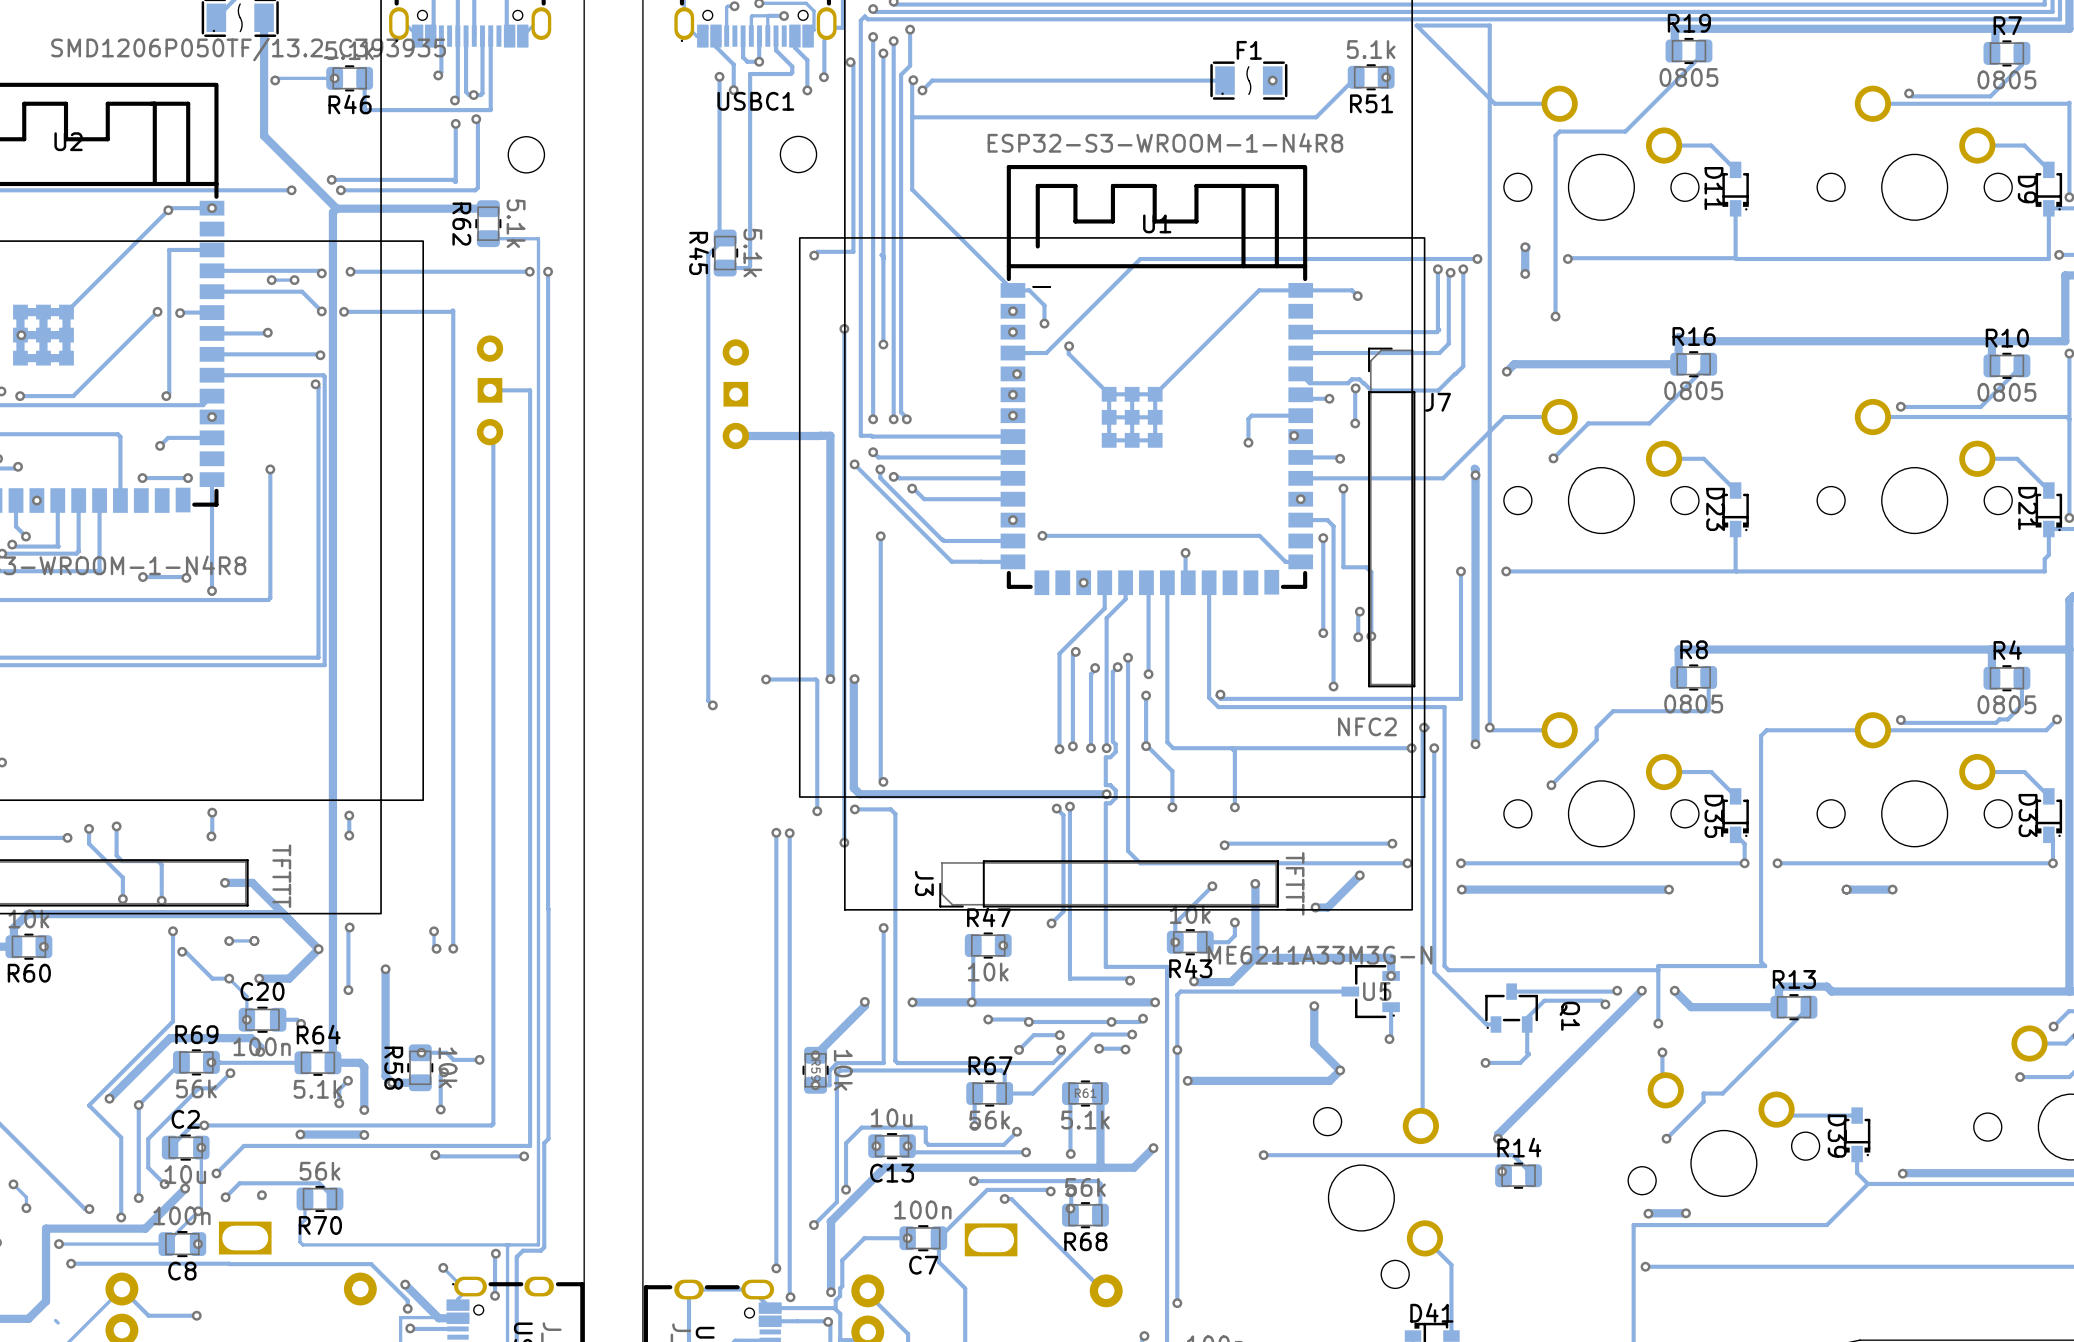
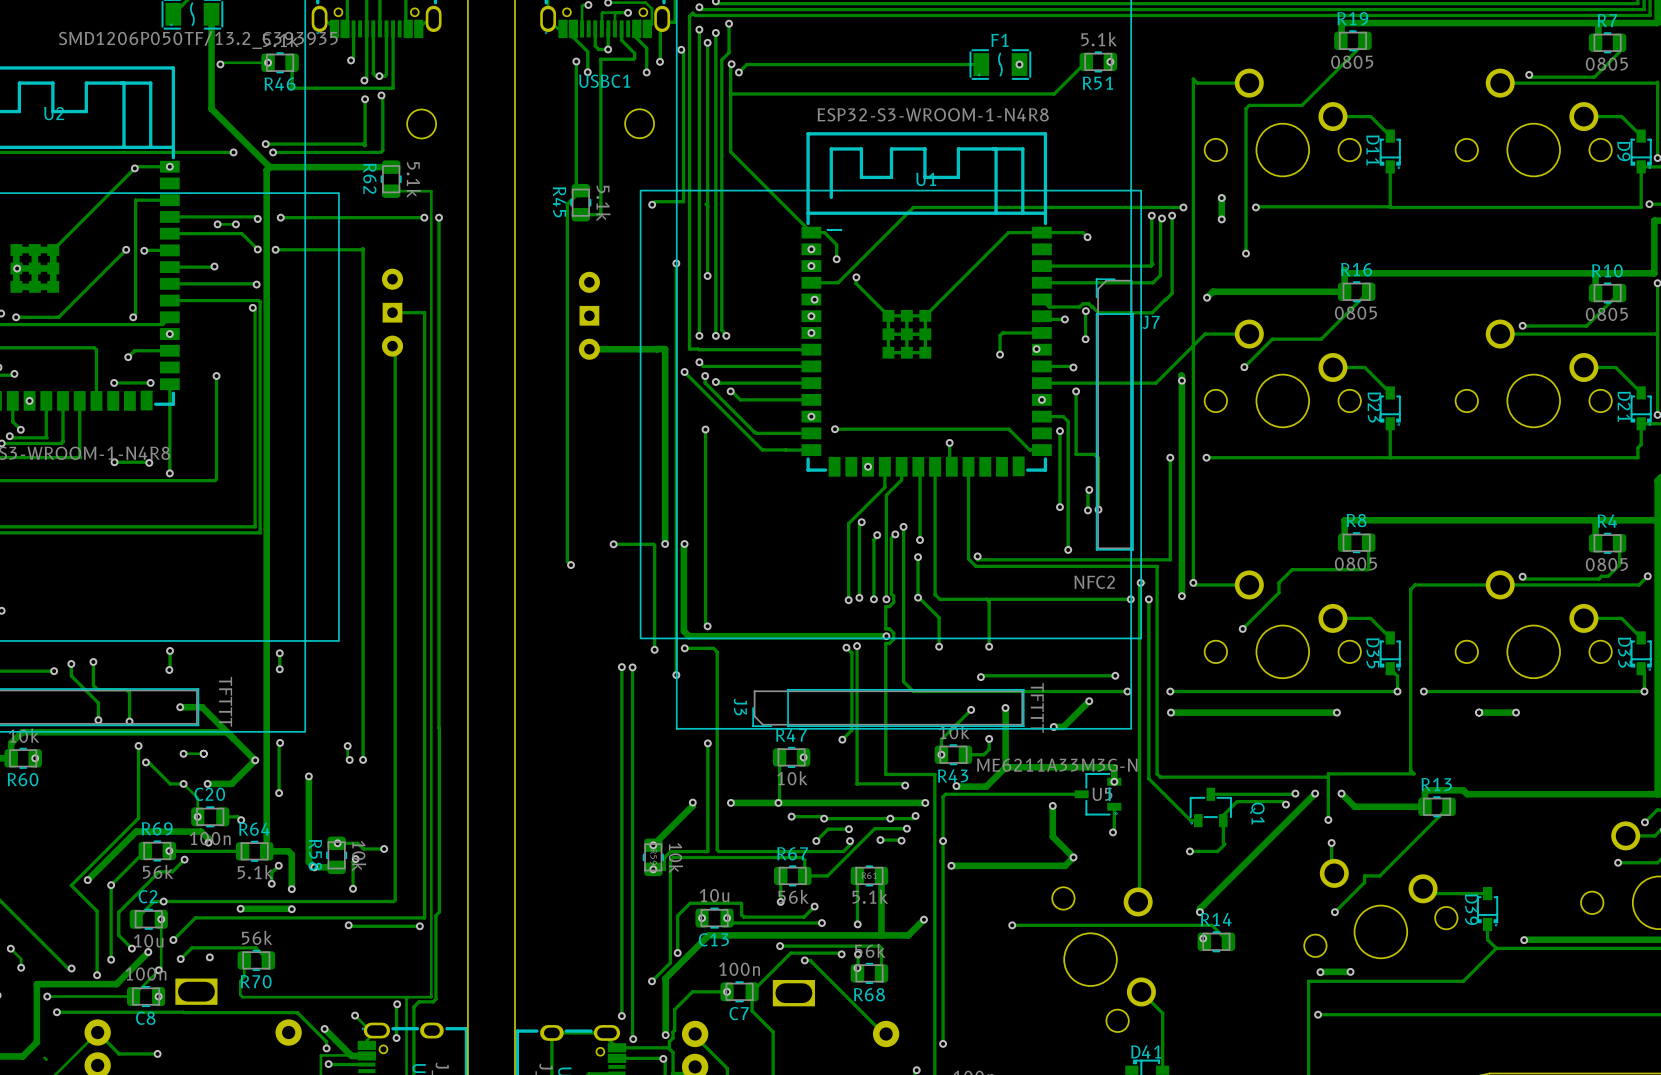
track: (1489, 25) (1416, 25) (1489, 98) (1489, 25) -> none

